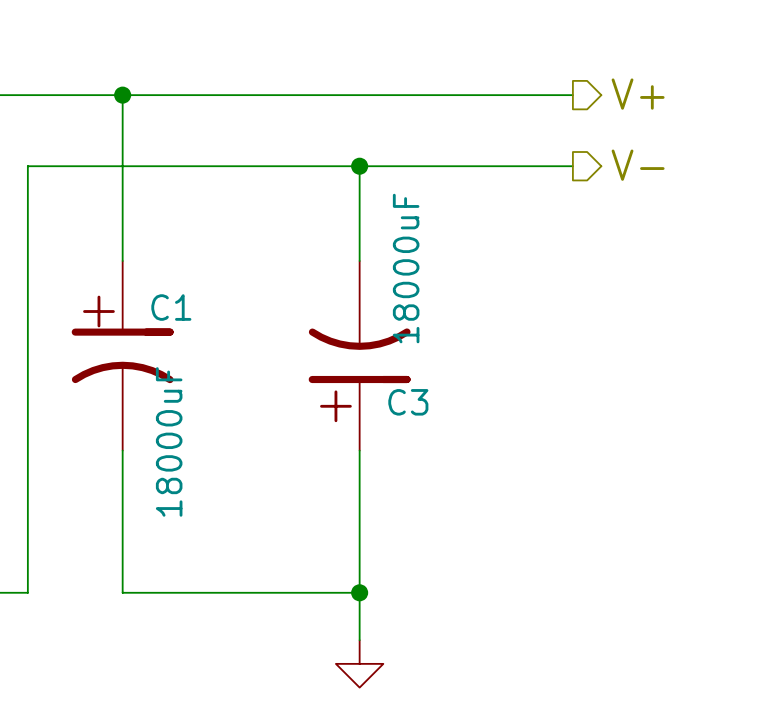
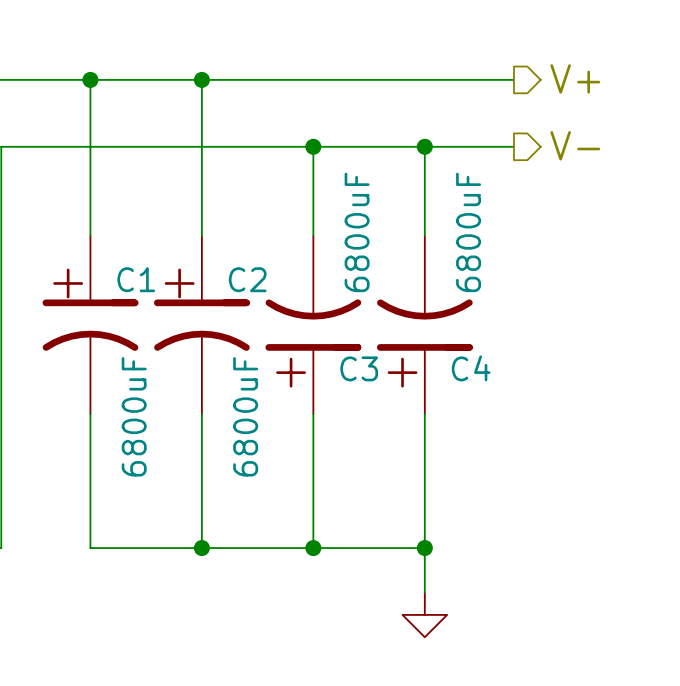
wire: none -> (201, 79) (201, 235)
junction: none -> (201, 79)
wire: none -> (424, 146) (424, 235)
junction: none -> (424, 146)
C3 value: 18000uF (406, 268) -> 6800uF (357, 232)
C2: none -> 6800uF (201, 325)
C4: none -> 6800uF (424, 325)
C1 value: 18000uF (169, 441) -> 6800uF (134, 416)
wire: none -> (201, 414) (201, 548)
wire: none -> (424, 414) (424, 592)
junction: none -> (201, 548)
wire: (359, 592) (359, 640) -> (313, 548) (424, 548)
junction: none -> (424, 548)
power symbol position: (359, 663) -> (424, 614)

